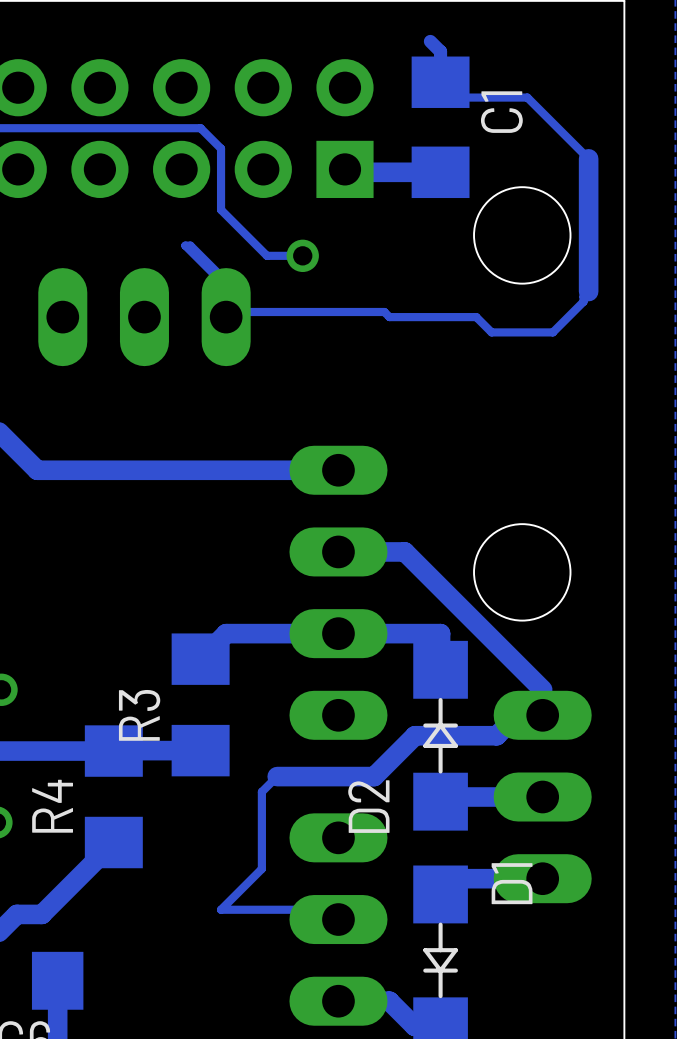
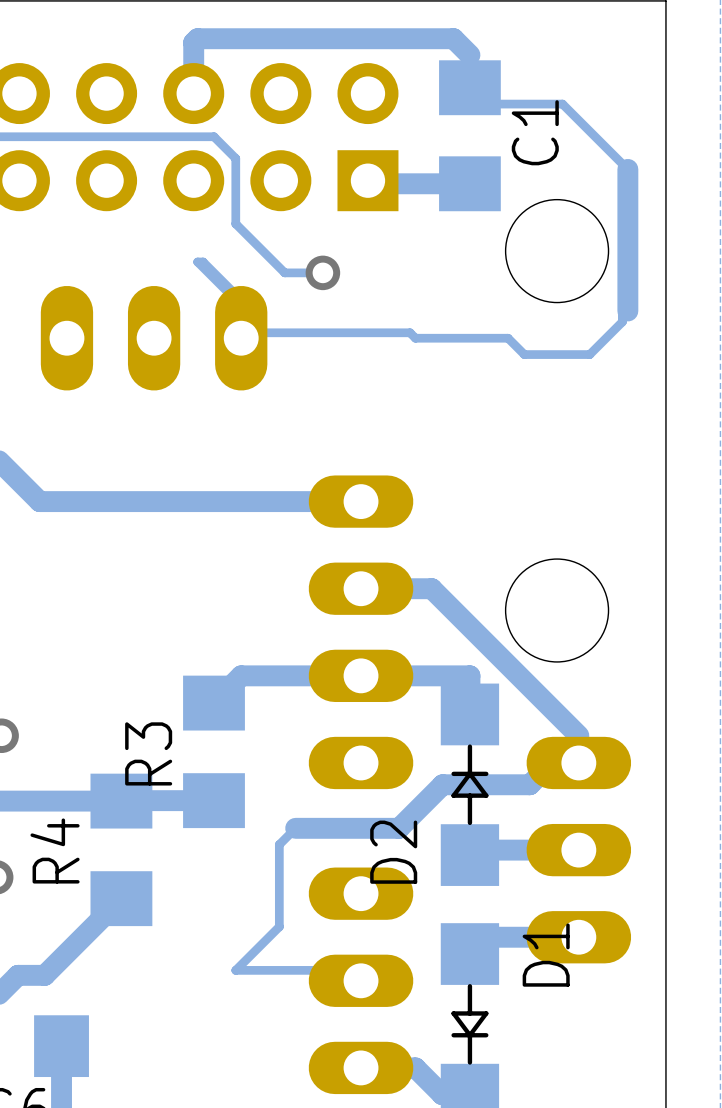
track: none -> (469, 55) (453, 38) (197, 38) (193, 42) (193, 93)

